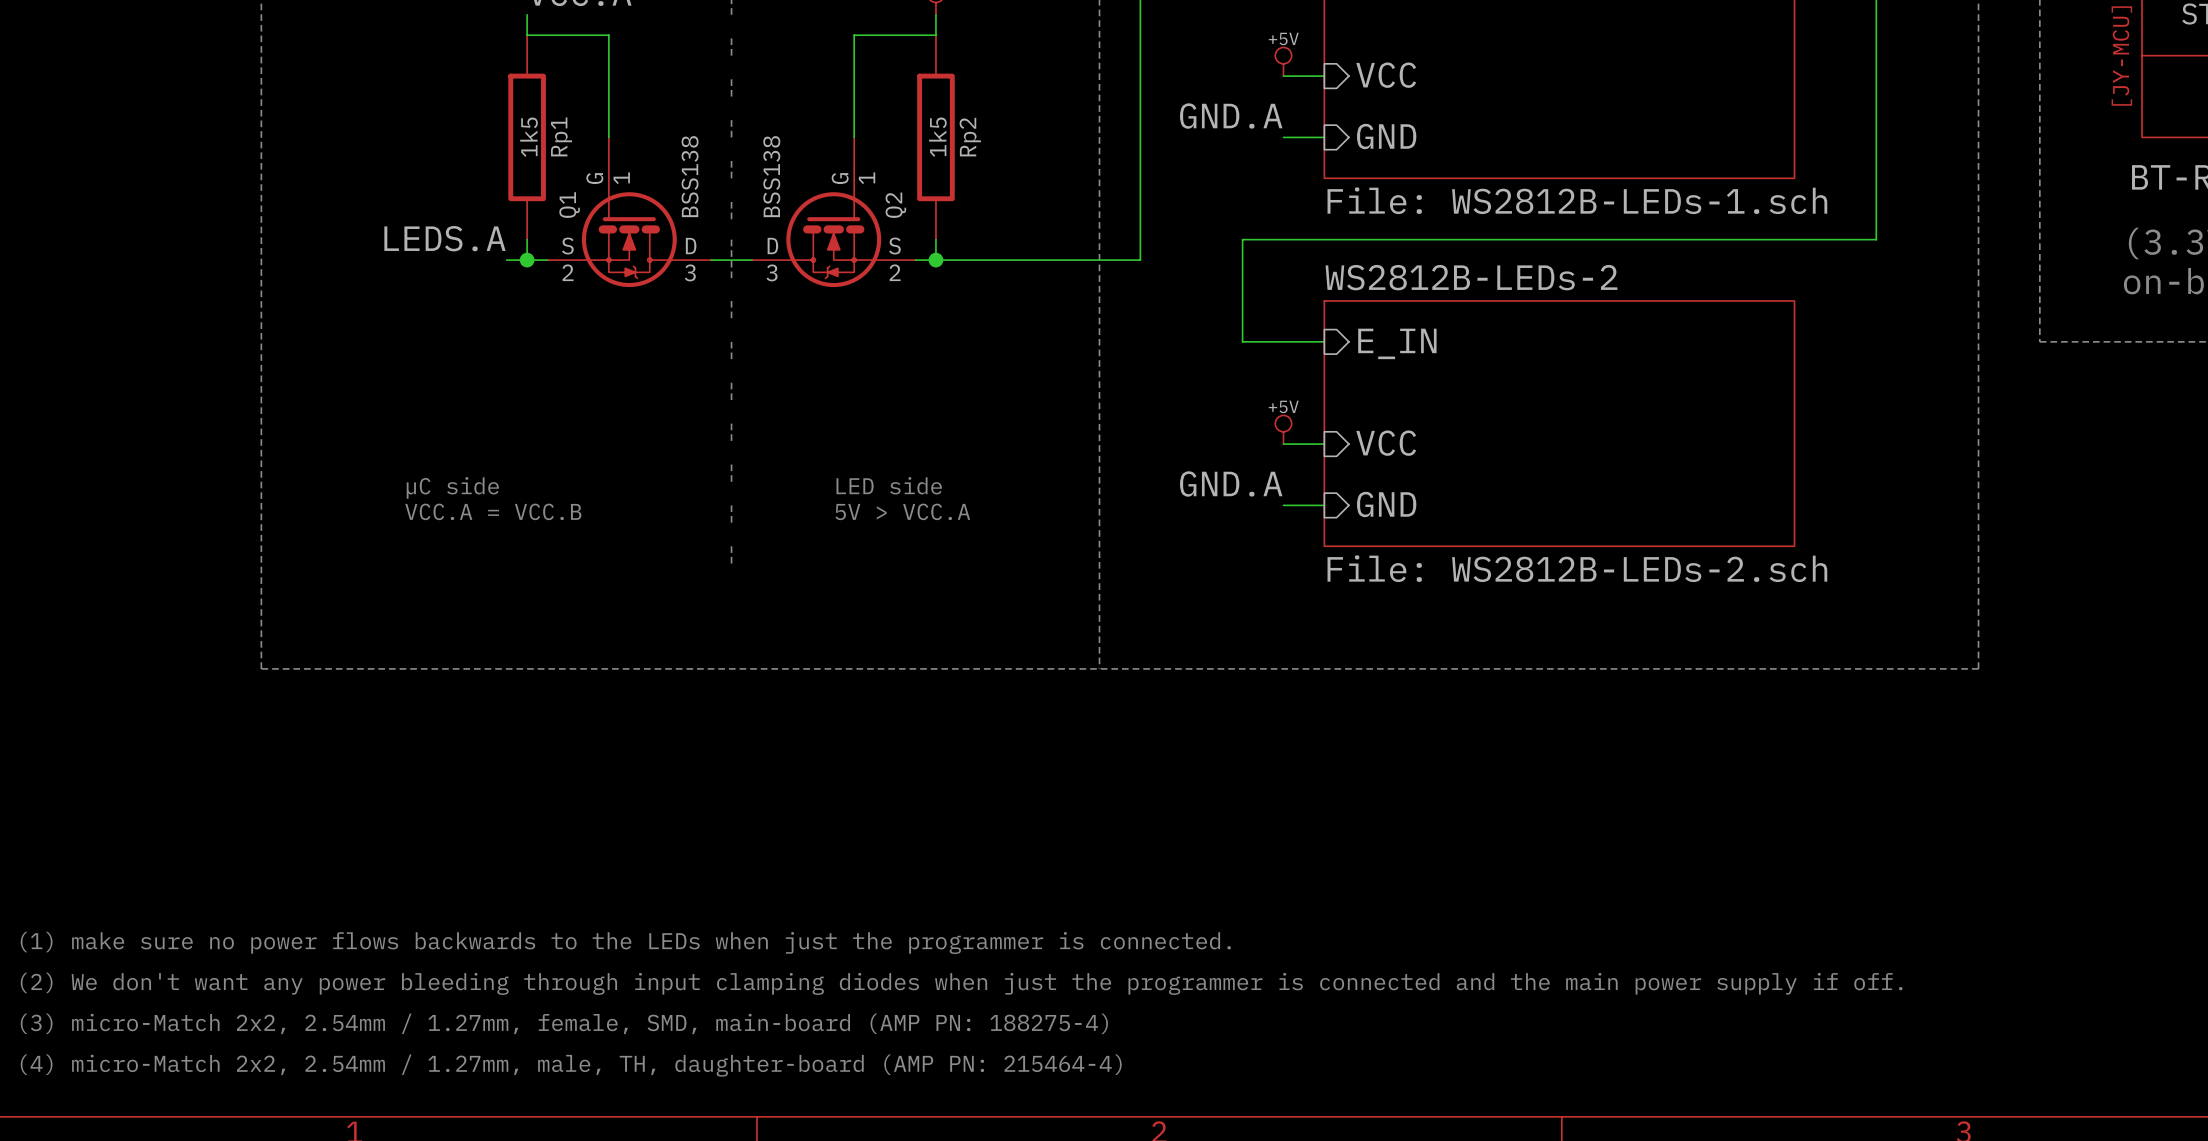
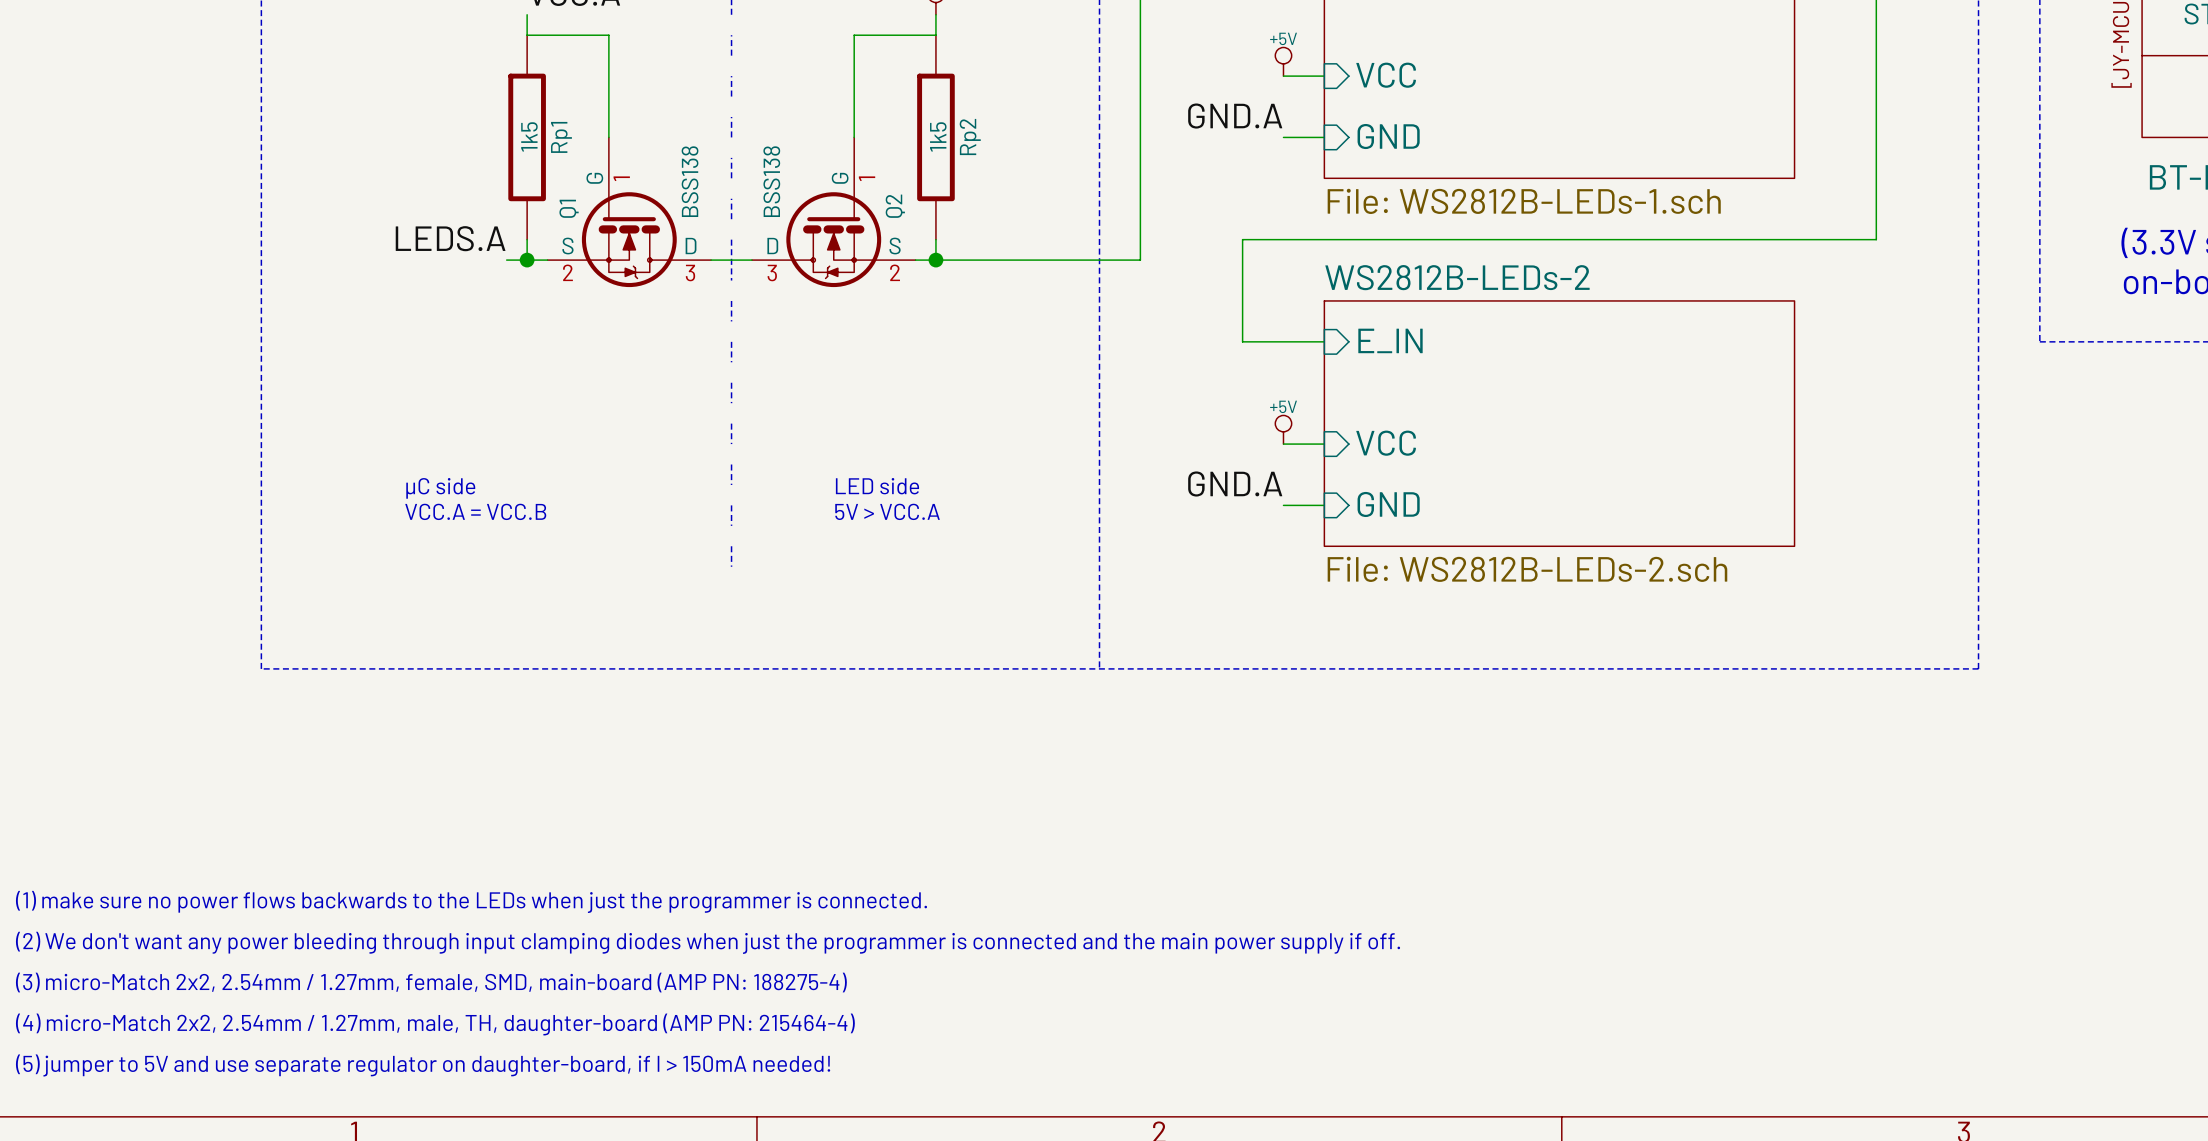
text: none -> (1) make sure no power flows backwards to the LEDs when just the programmer is connected. (471, 901)
text: (1) make sure no power flows backwards to the LEDs when just the programmer is connected. (625, 942) -> (2) We don't want any power bleeding through input clamping diodes when just the programmer is connected and the main power supply if off. (708, 942)
text: (2) We don't want any power bleeding through input clamping diodes when just the programmer is connected and the main power supply if off. (961, 983) -> (3) micro-Match 2x2, 2.54mm / 1.27mm, female, SMD, main-board (AMP PN: 188275-4) (431, 982)
text: (3) micro-Match 2x2, 2.54mm / 1.27mm, female, SMD, main-board (AMP PN: 188275-4) (564, 1023) -> (4) micro-Match 2x2, 2.54mm / 1.27mm, male, TH, daughter-board (AMP PN: 215464-4) (435, 1024)
text: (4) micro-Match 2x2, 2.54mm / 1.27mm, male, TH, daughter-board (AMP PN: 215464-4) (571, 1065) -> (5) jumper to 5V and use separate regulator on daughter-board, if I > 150mA needed! (423, 1065)

